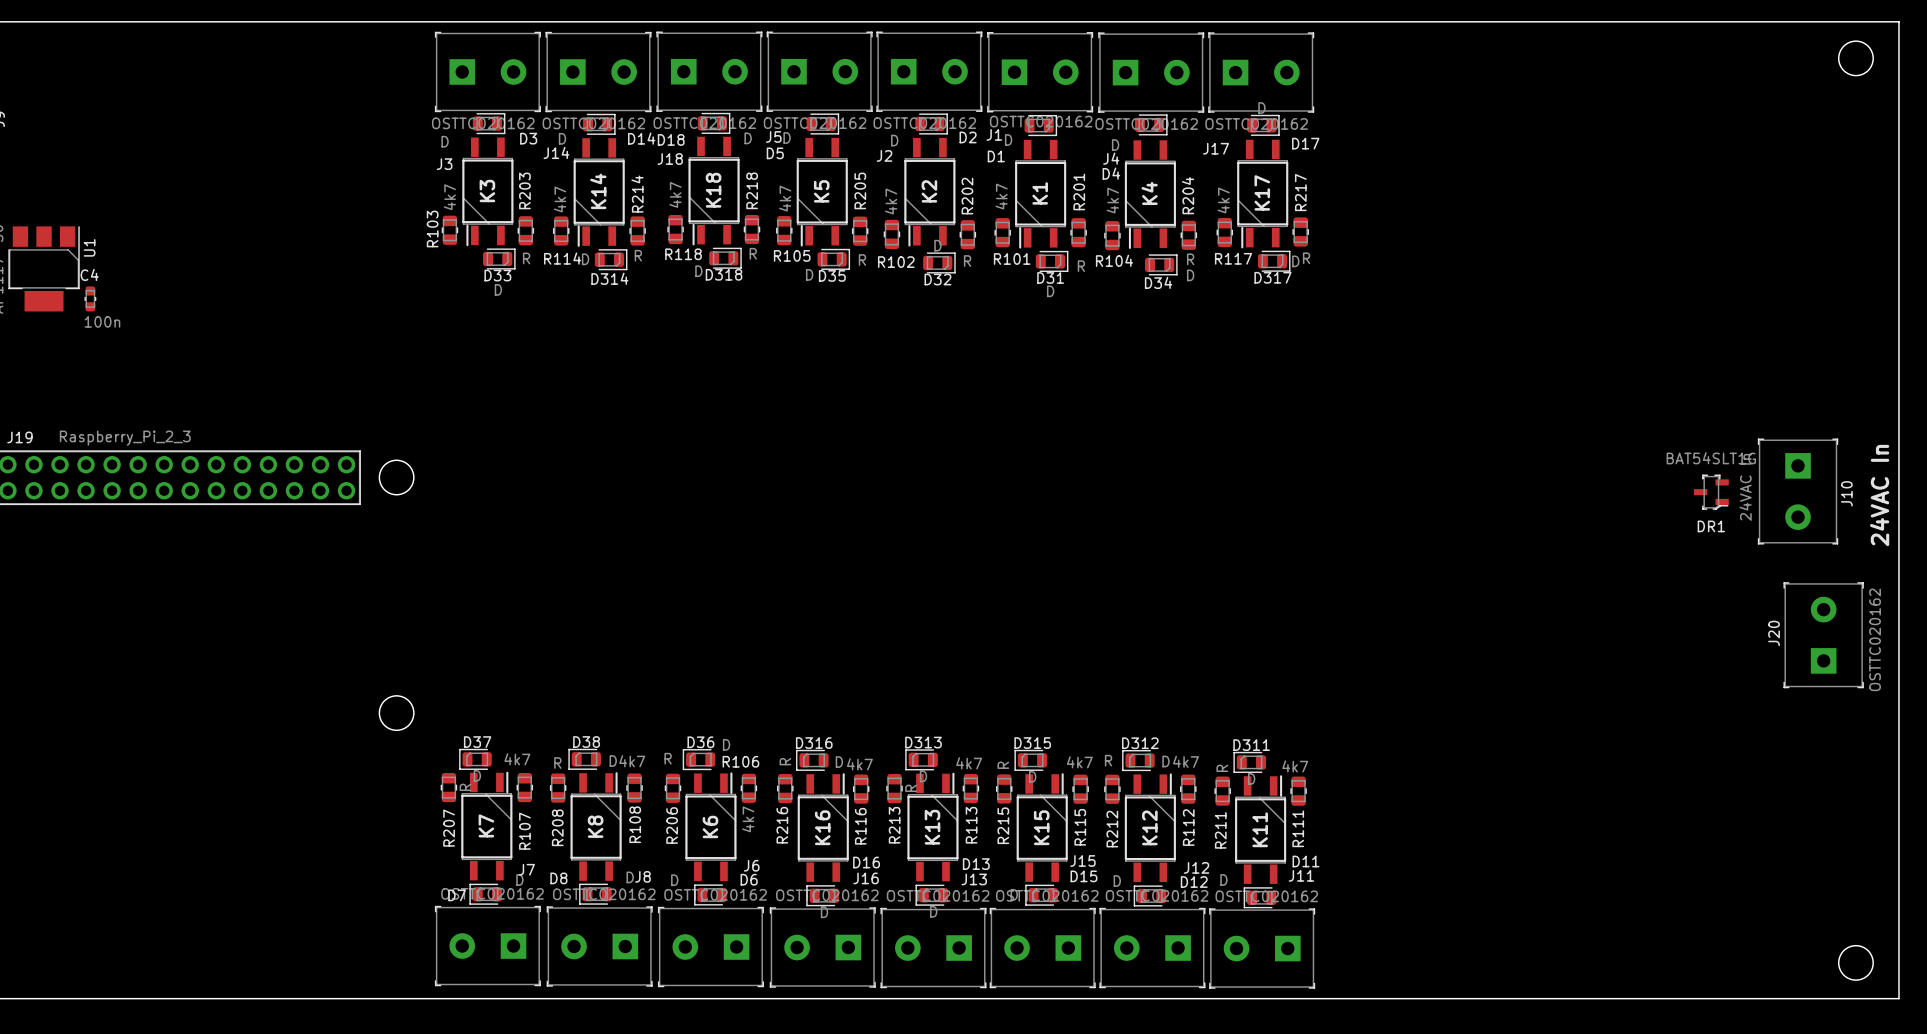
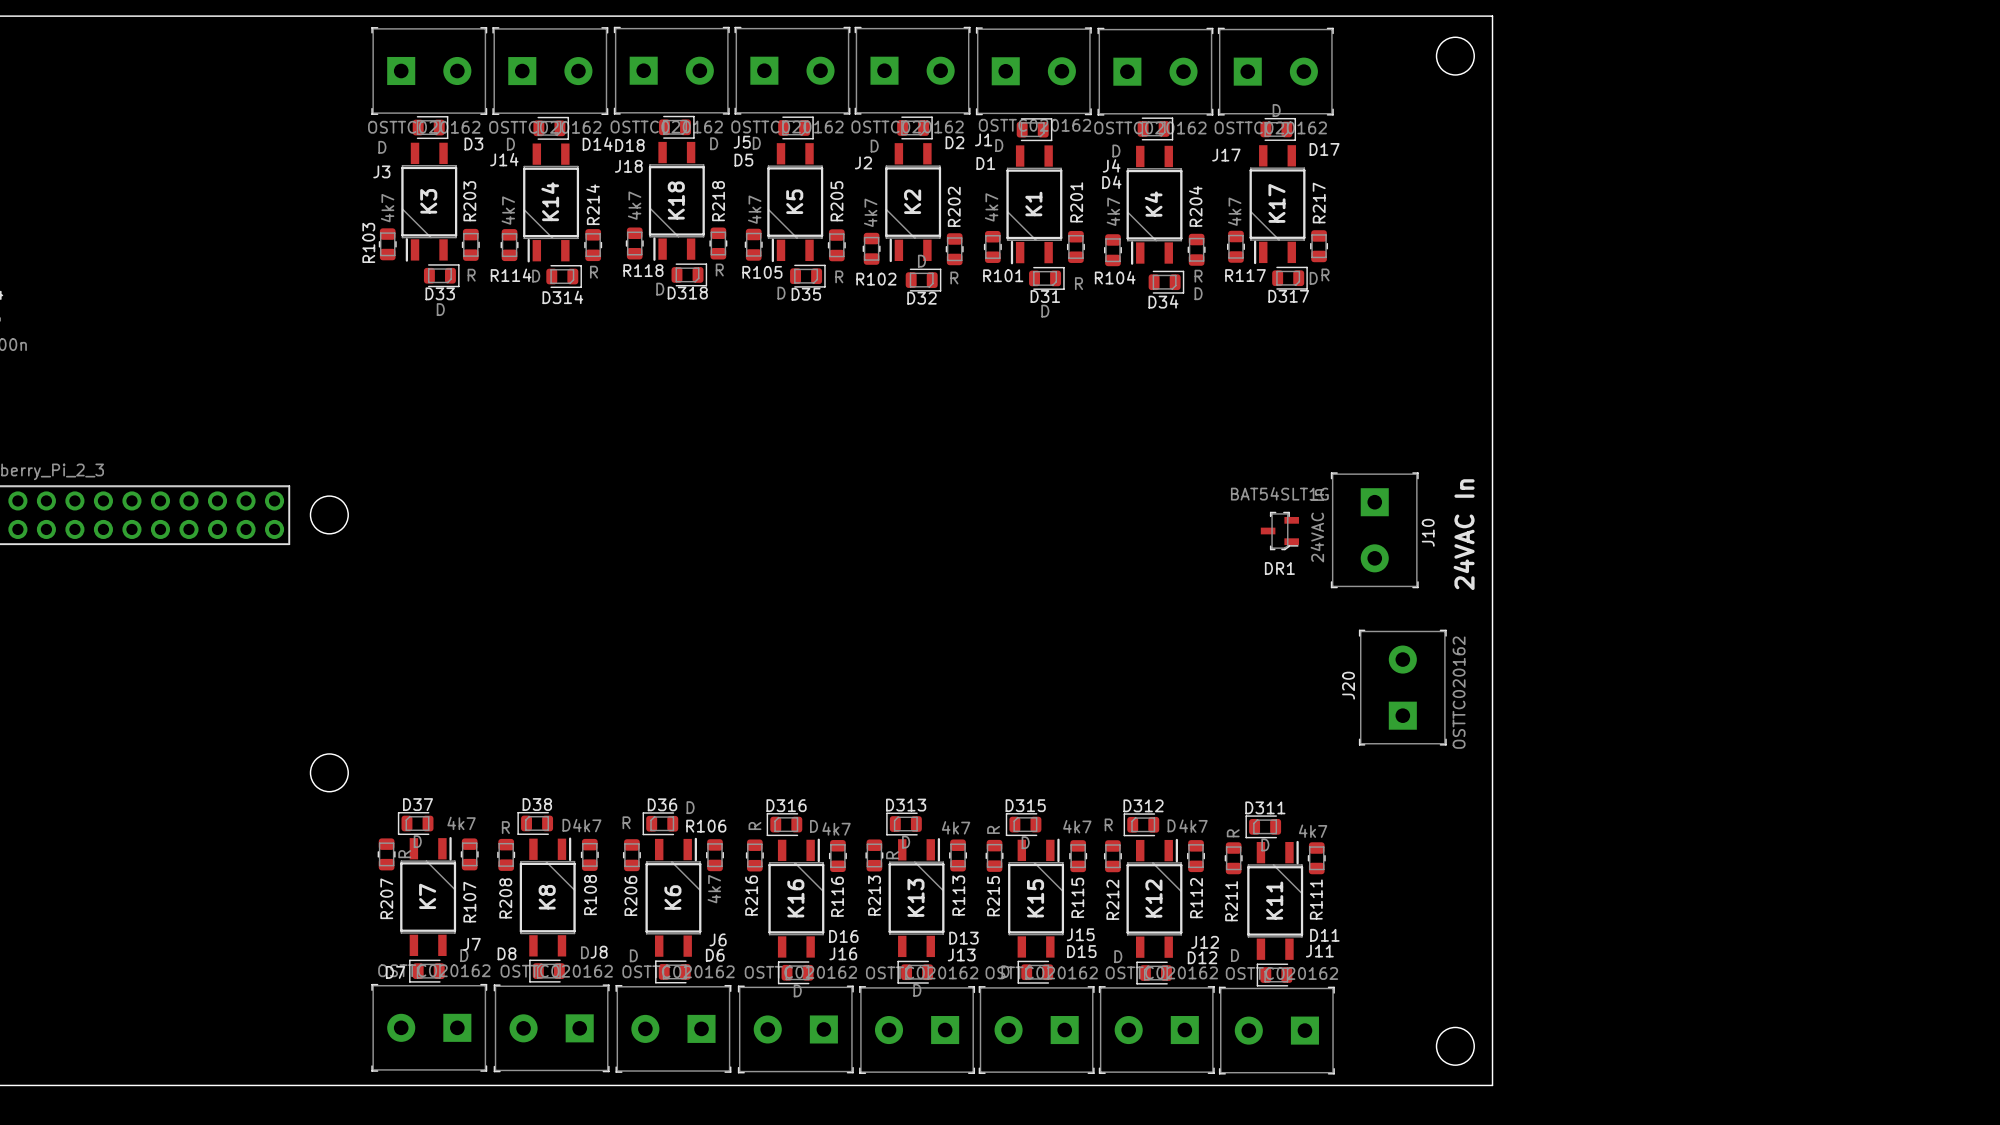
board edge: (1459, 21) (1898, 21) (1898, 998) (1459, 998) -> (1492, 16) (1492, 1085)
round board edge: none -> [1435, 36, 1475, 76]
round board edge: [1838, 40, 1874, 77] -> none
J10 position: (1798, 491) -> (1374, 530)
DR1 position: (1711, 492) -> (1279, 531)
text: none -> 24VAC In (1464, 534)
text: 24VAC In (1879, 495) -> none
J20 position: (1823, 635) -> (1402, 687)
round board edge: none -> [1435, 1026, 1475, 1066]
round board edge: [1838, 945, 1874, 981] -> none

